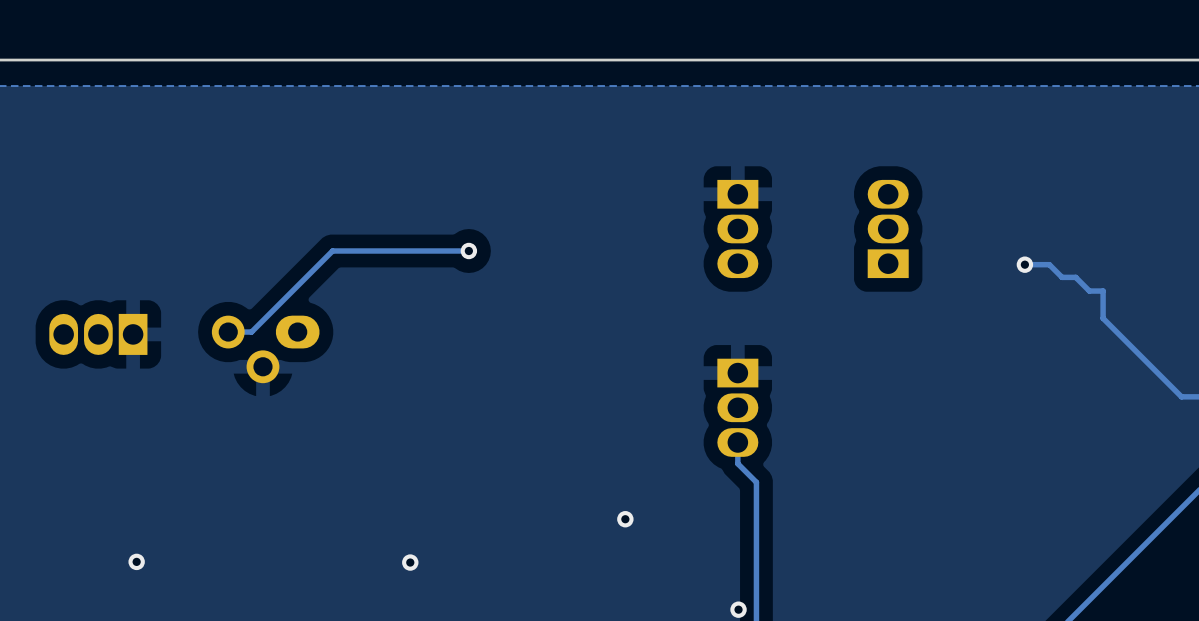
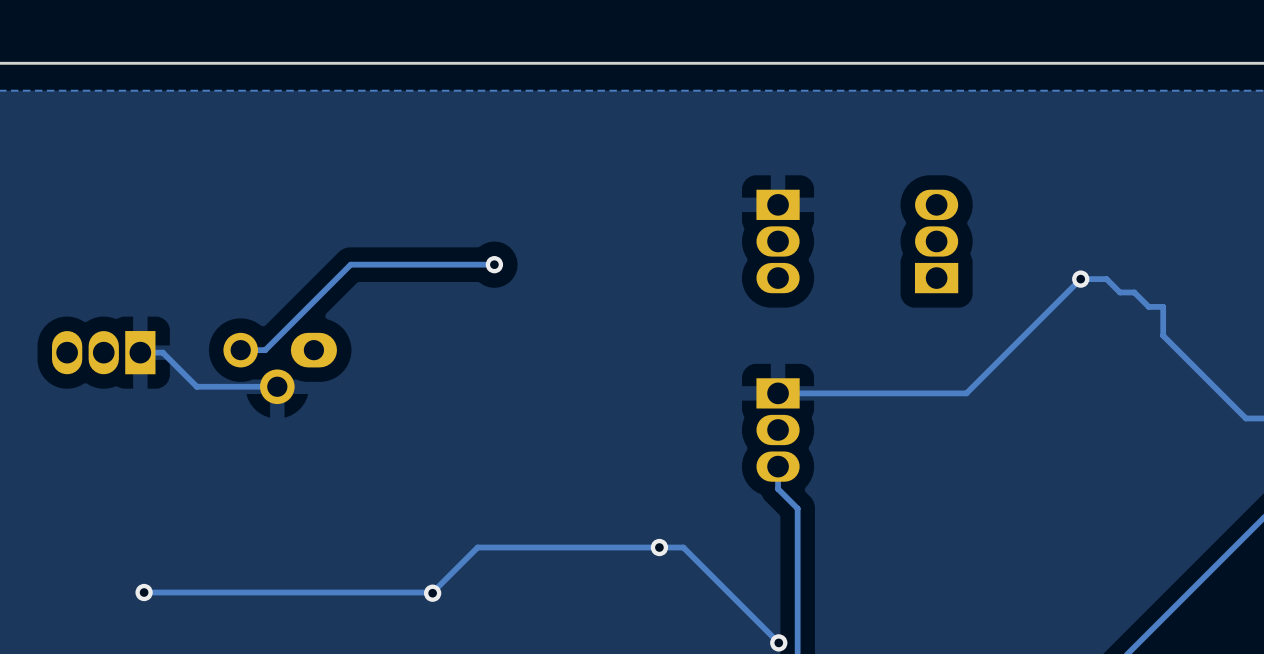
track: none -> (1080, 279) (966, 393) (778, 393)
track: none -> (140, 352) (162, 352) (196, 386) (277, 386)
track: none -> (432, 592) (477, 547) (683, 547) (778, 642)
track: none -> (432, 592) (144, 592)

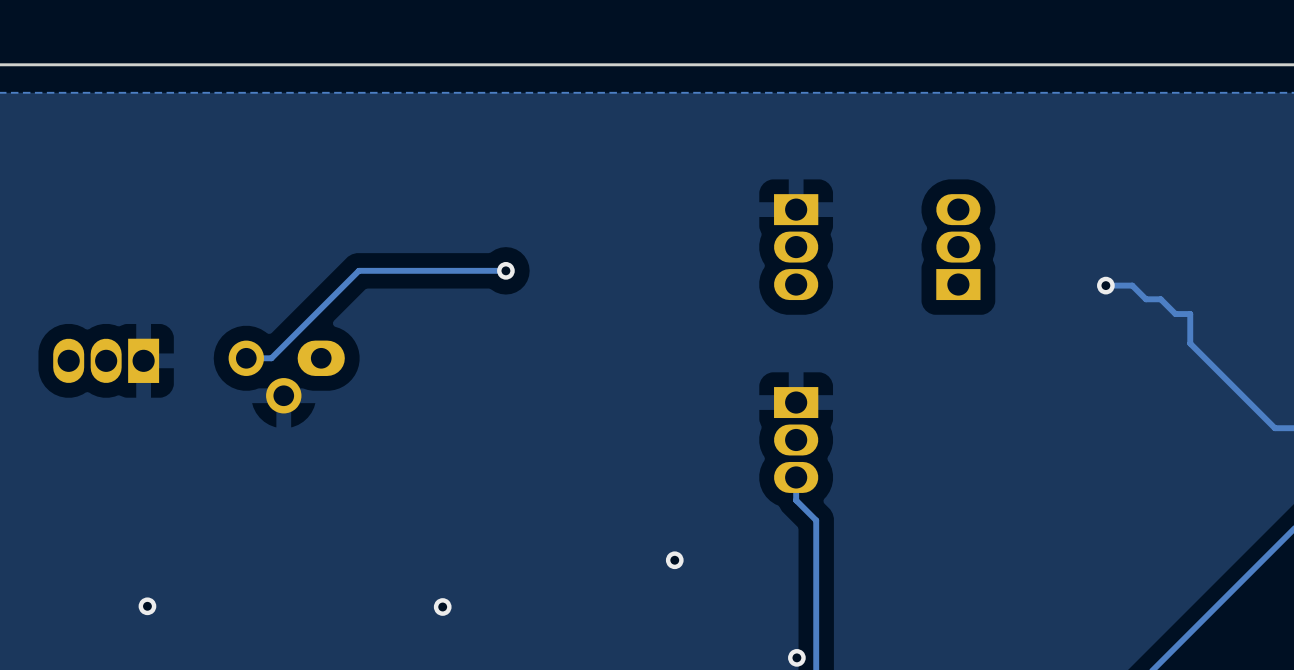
track: (1080, 279) (966, 393) (778, 393) -> none
track: (140, 352) (162, 352) (196, 386) (277, 386) -> none
track: (432, 592) (477, 547) (683, 547) (778, 642) -> none
track: (432, 592) (144, 592) -> none

